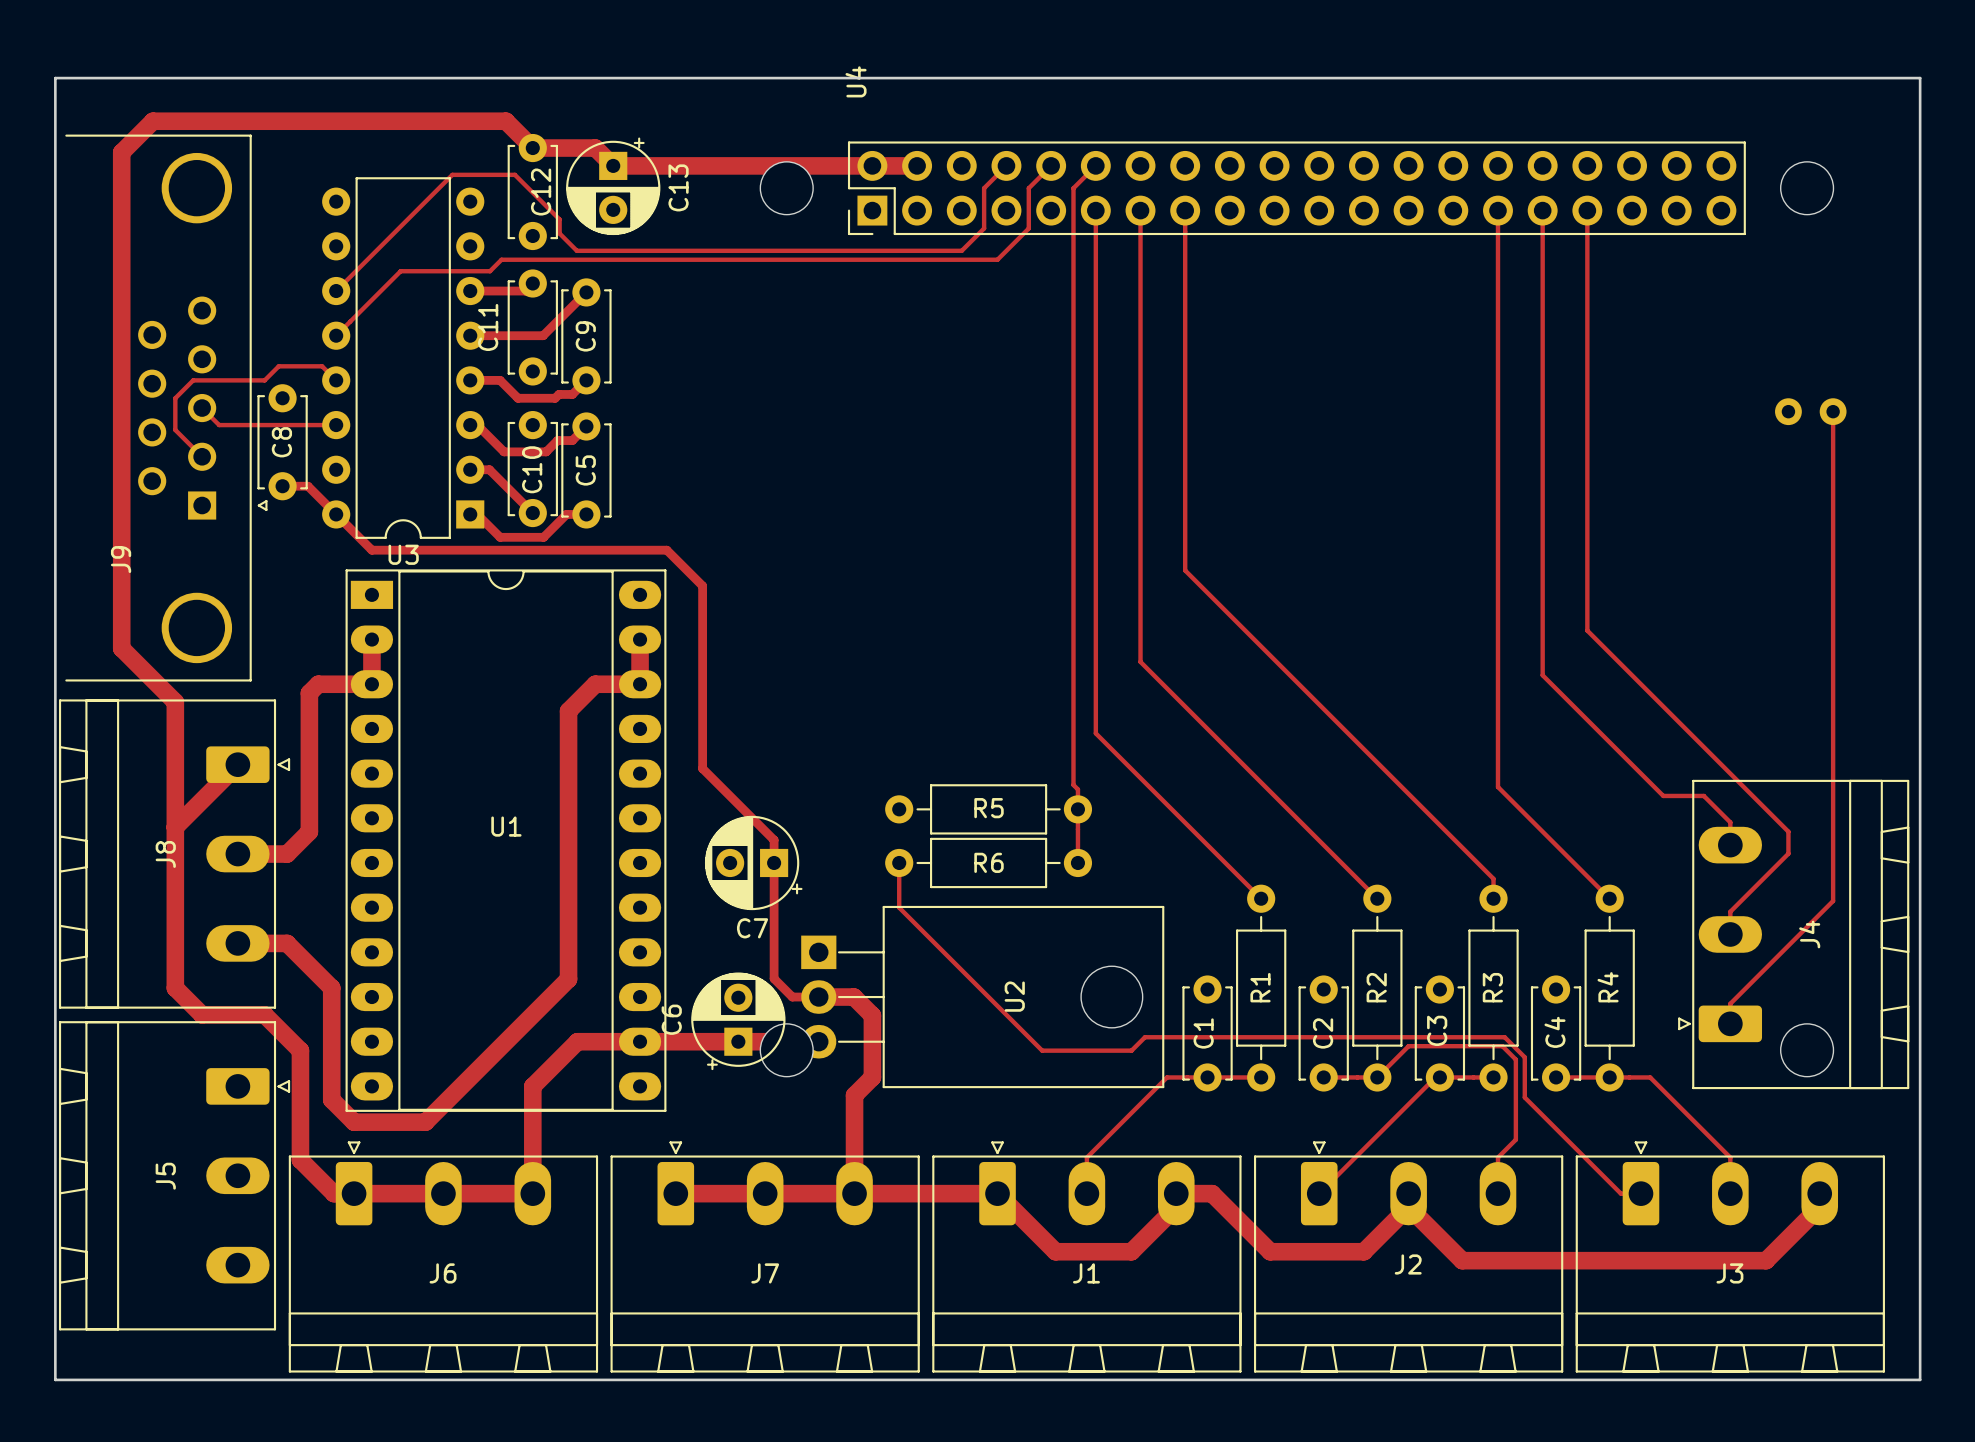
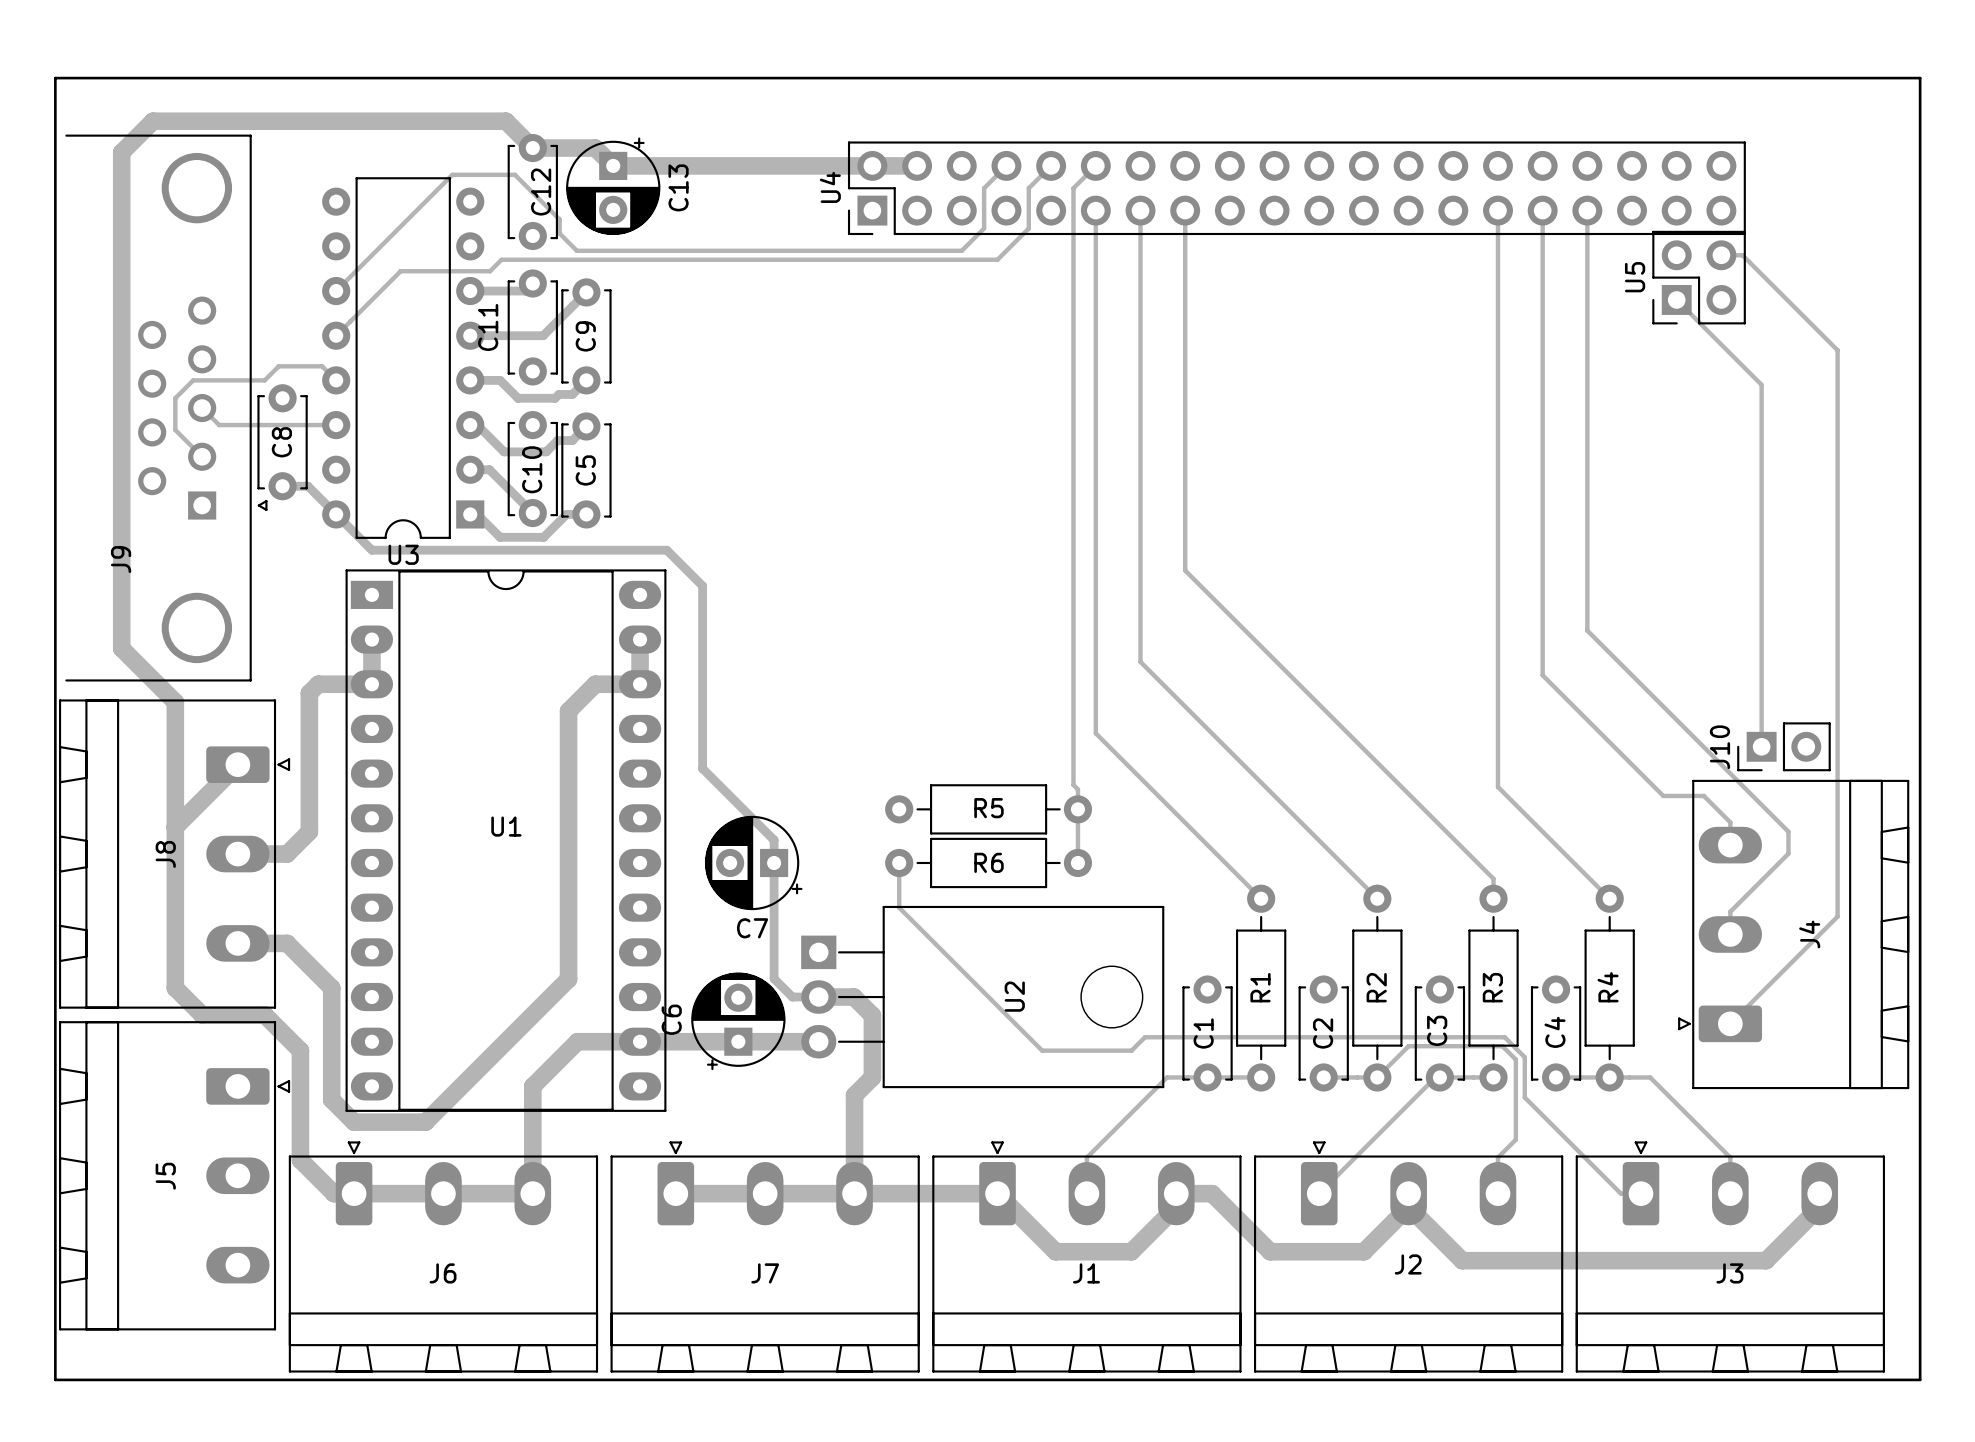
U4 name position: U4 (856, 81) -> U4 (830, 187)
U4 footprint: [760, 141, 1847, 1077] -> [847, 141, 1746, 236]
U5: none -> (1699, 277)
track: none -> (1676, 299) (1761, 384) (1761, 746)
track: (1833, 411) (1833, 901) (1730, 1003) (1730, 1023) -> (1721, 255) (1742, 255) (1837, 350) (1837, 916) (1730, 1023)
J10: none -> (1783, 746)

